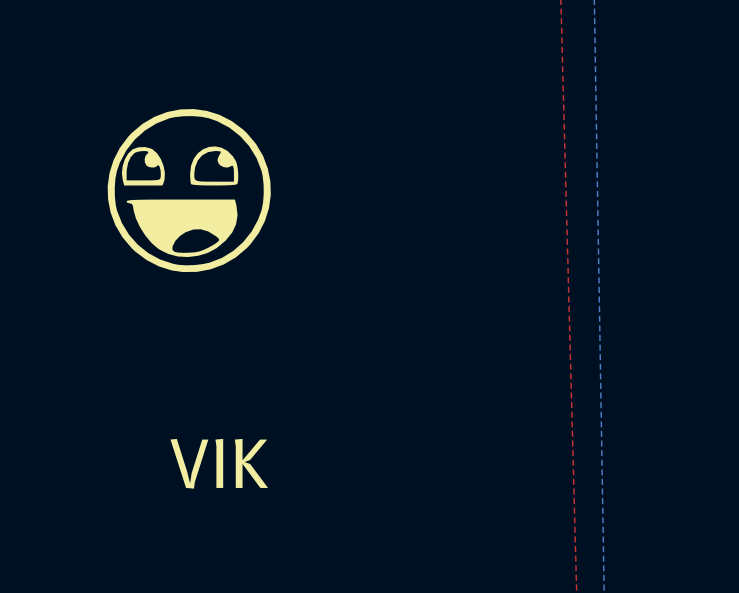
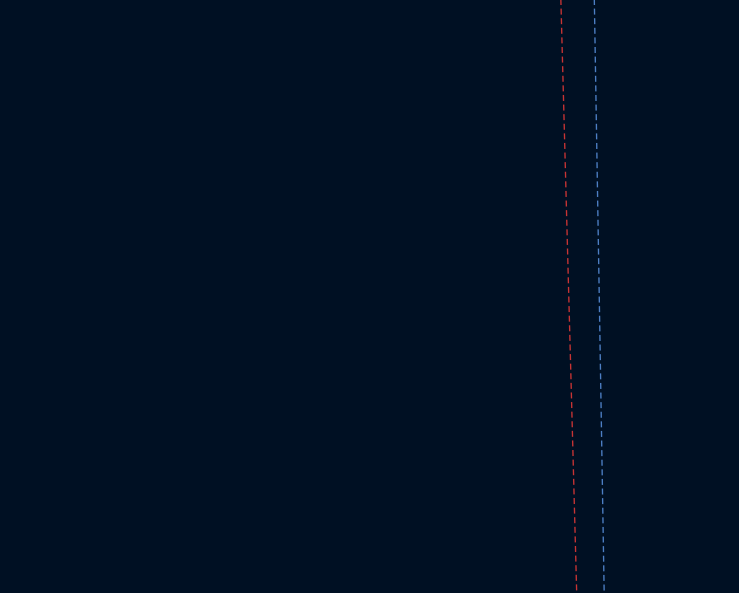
drawing: [107, 109, 271, 273] -> none
text: VIK (219, 463) -> none

